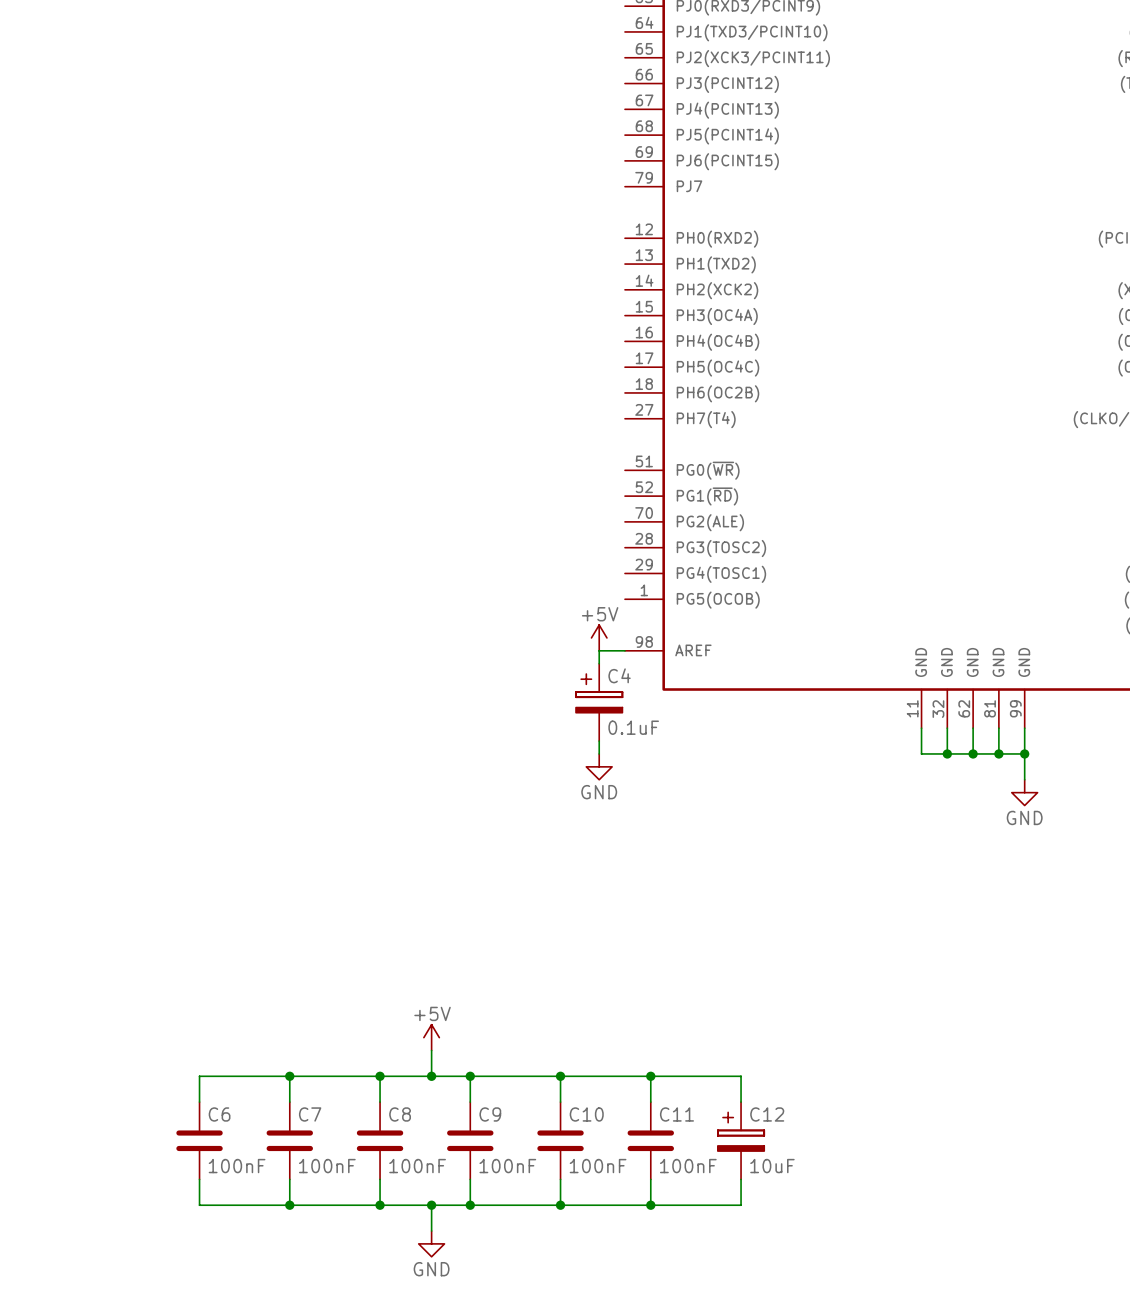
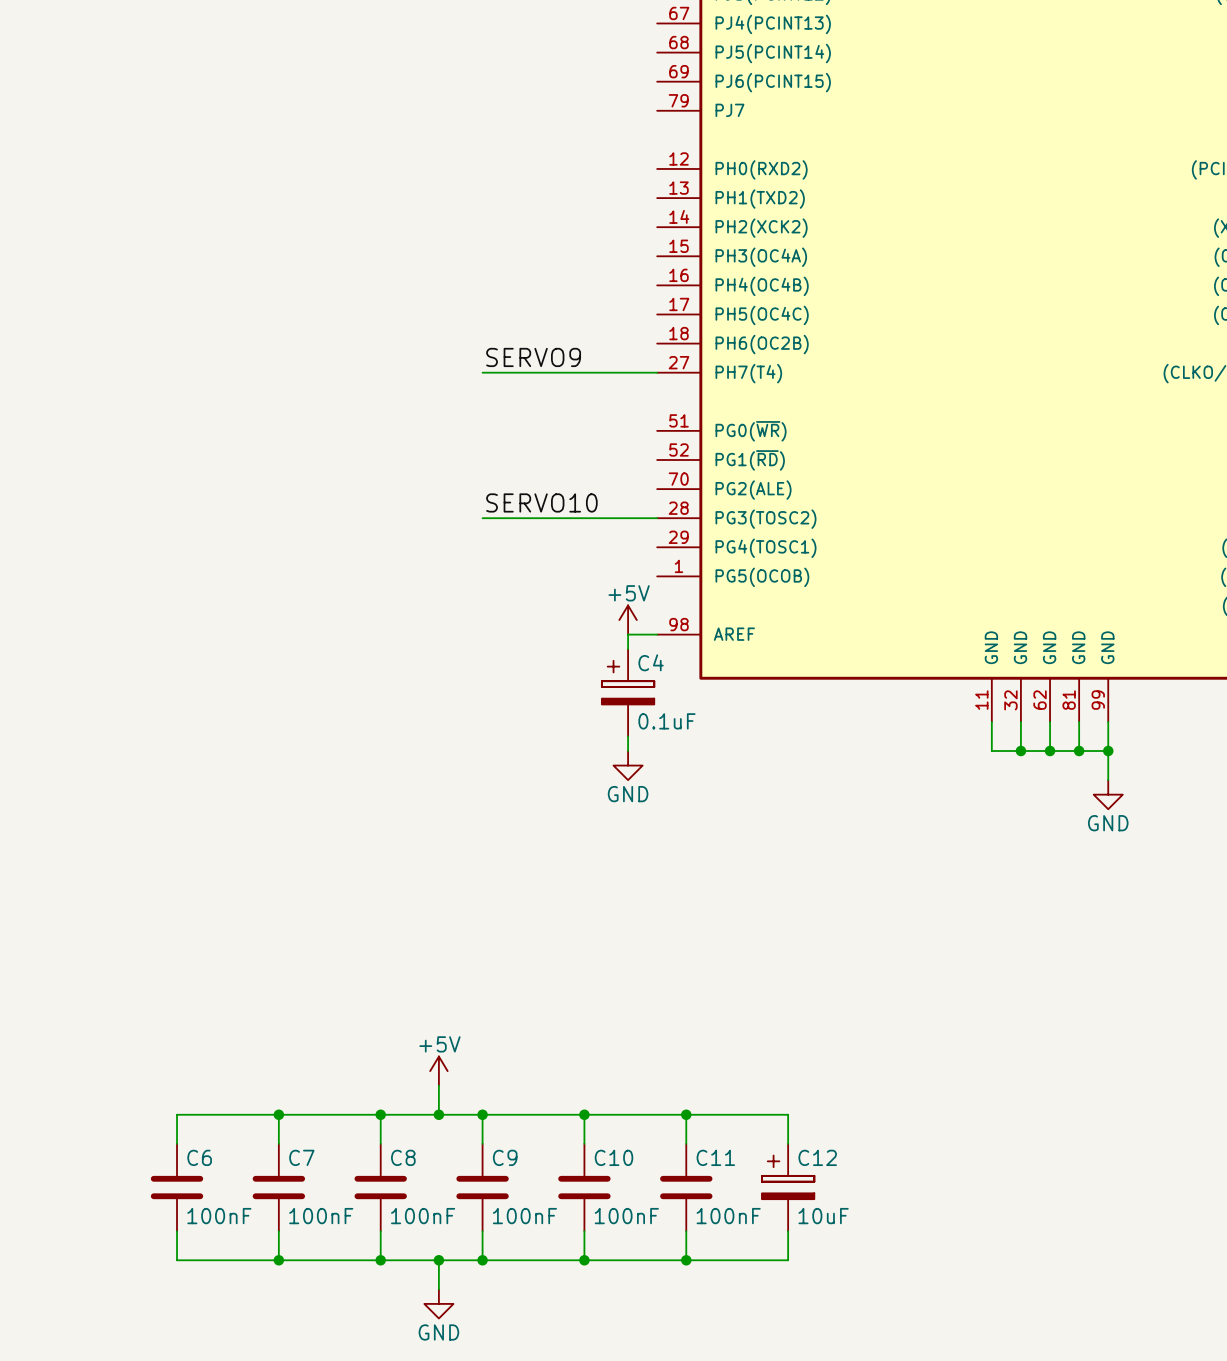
label: none -> SERVO9 (533, 357)
wire: none -> (482, 372) (657, 372)
label: none -> SERVO10 (541, 502)
wire: none -> (482, 518) (657, 518)

